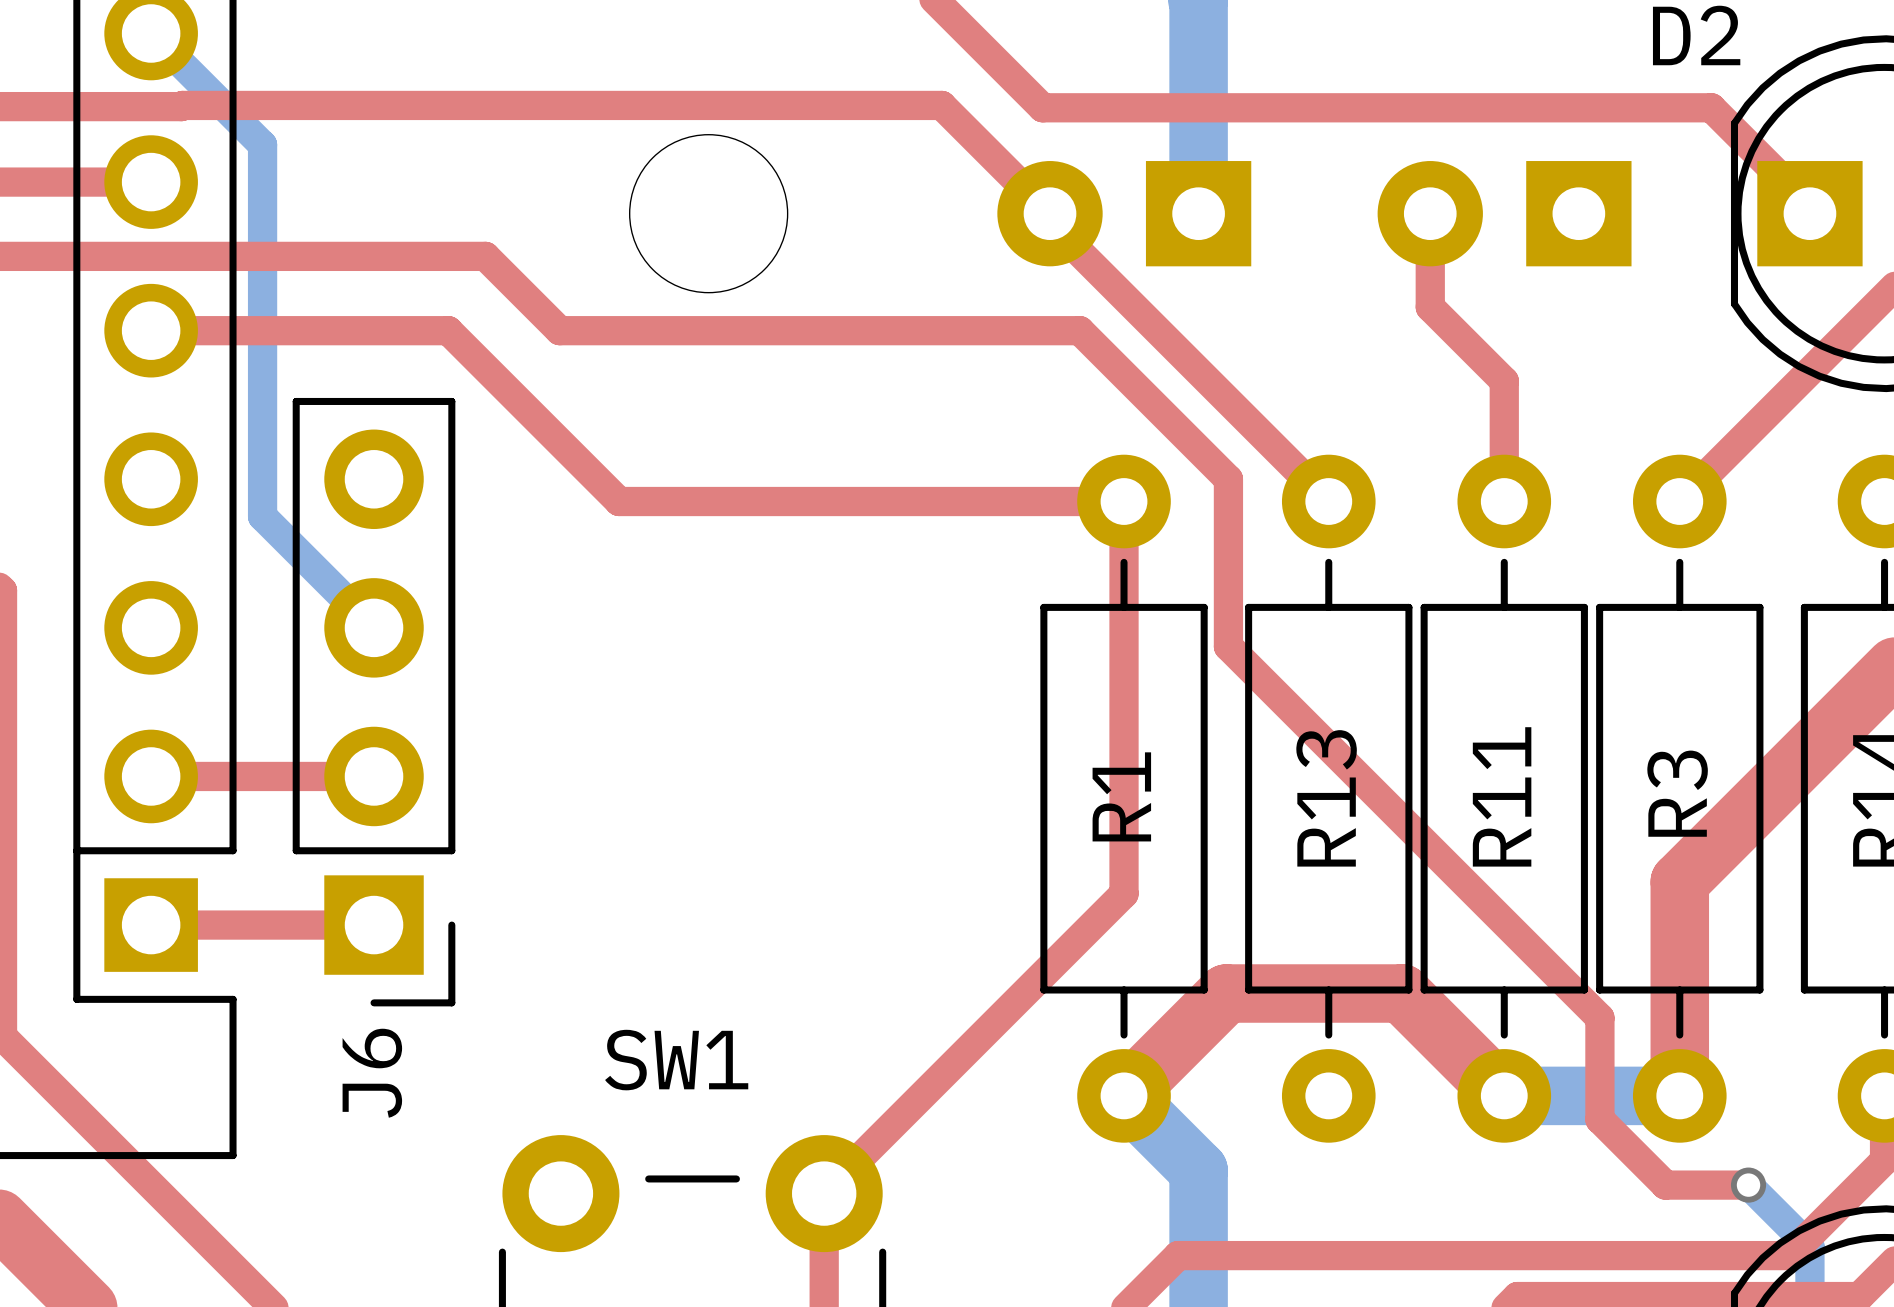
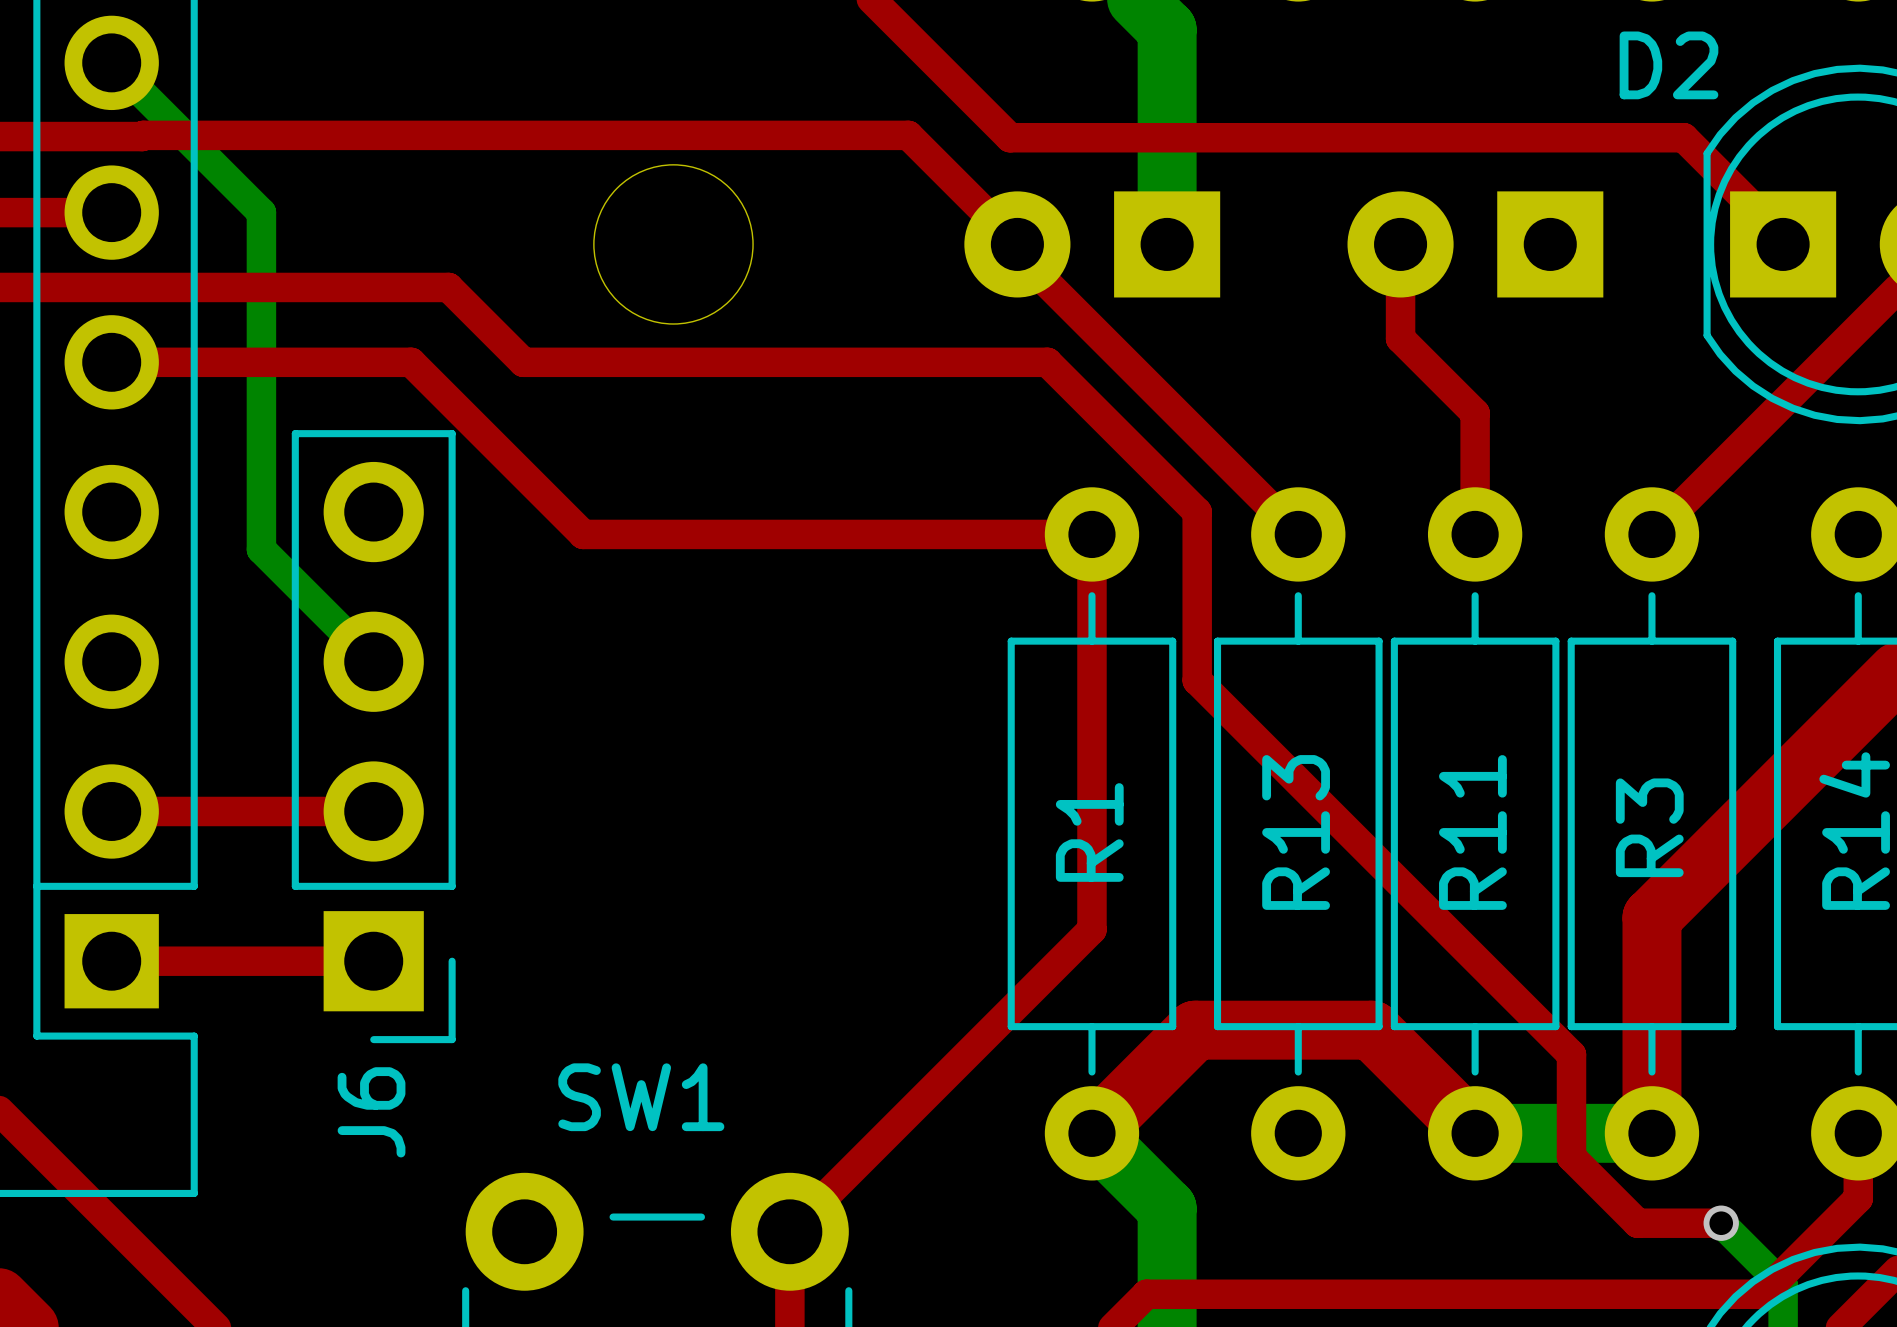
bottom track: (262, 144) (262, 516) (374, 627) -> (224, 175) (261, 212) (261, 549) (373, 661)
J6 position: (374, 702) -> (373, 736)

